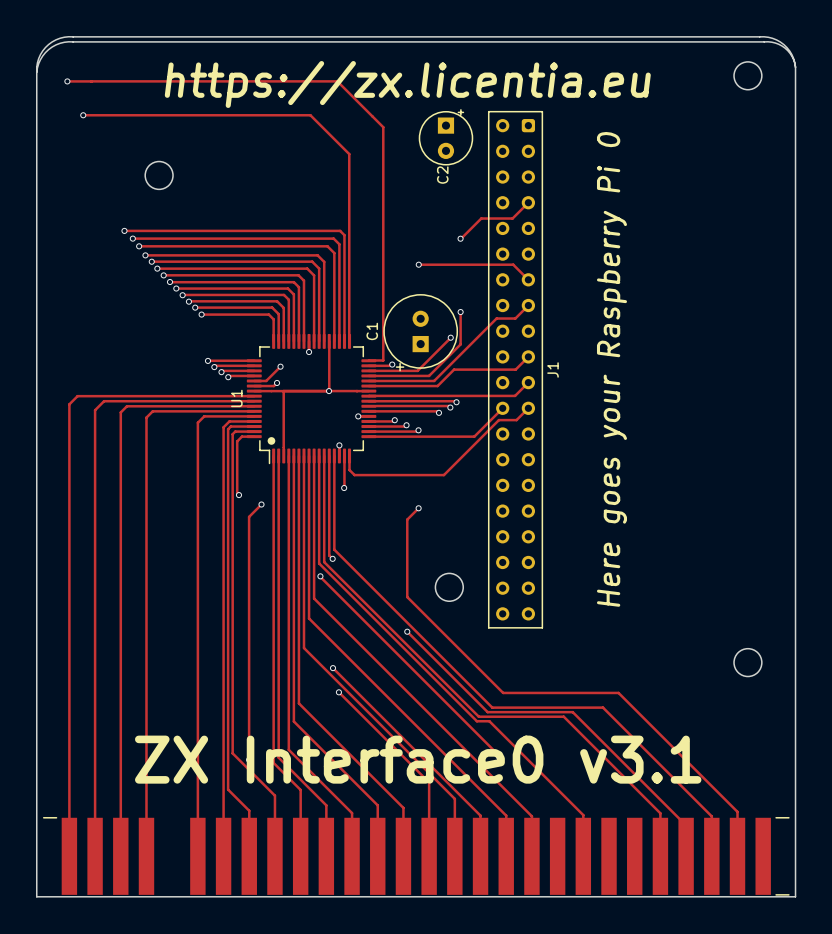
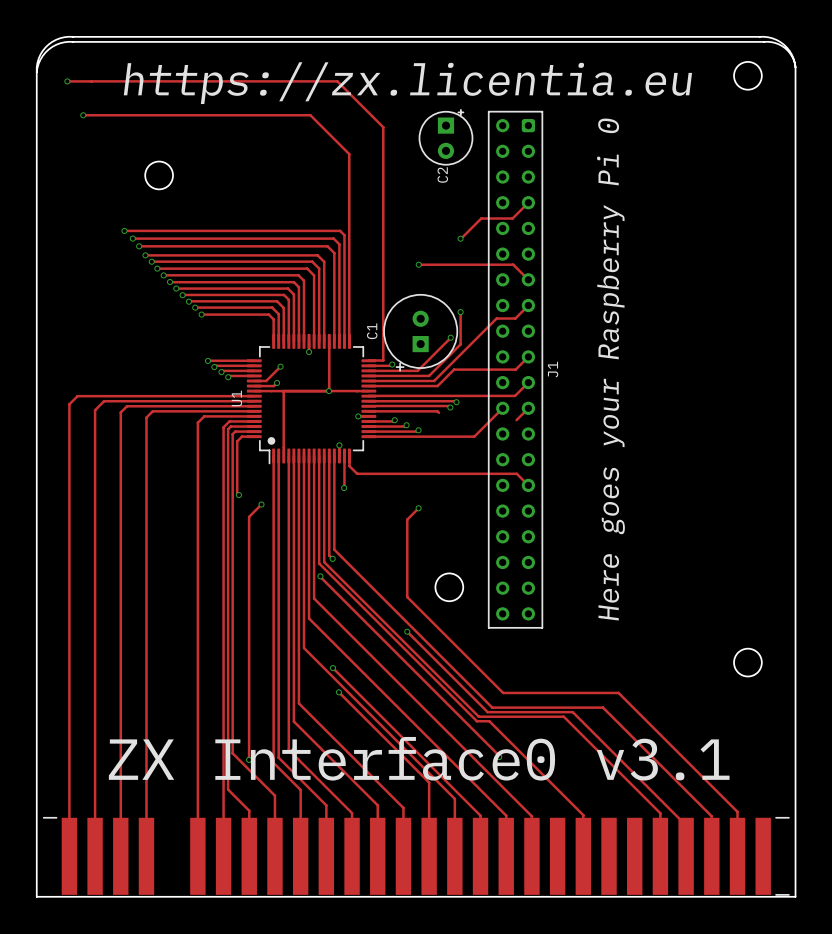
via: (438, 412) -> none
track: (516, 420) (498, 420) (443, 475) (354, 475) (349, 470) (349, 456) -> (528, 485) (516, 473) (357, 473) (349, 466) (349, 455)

